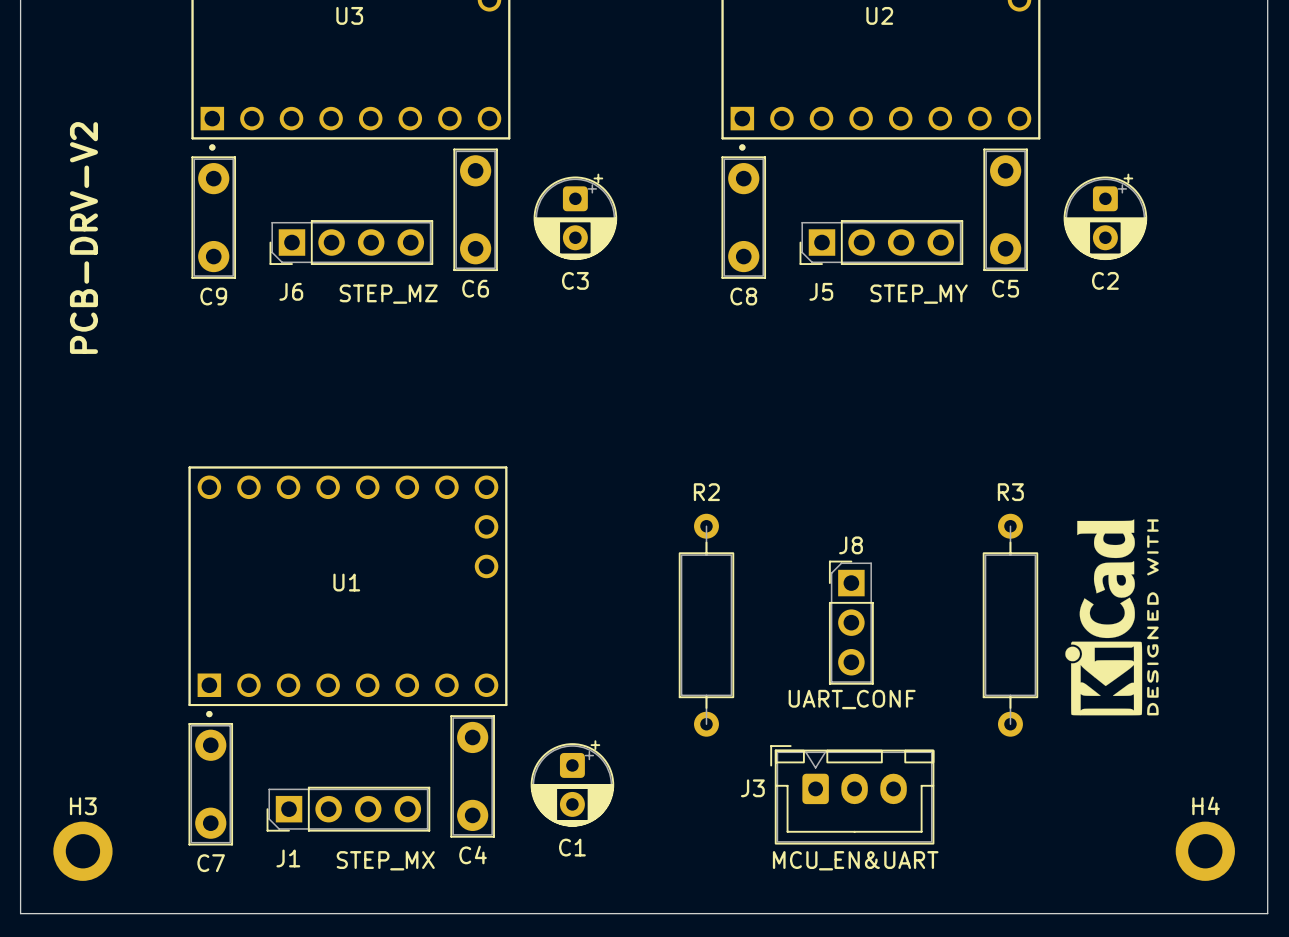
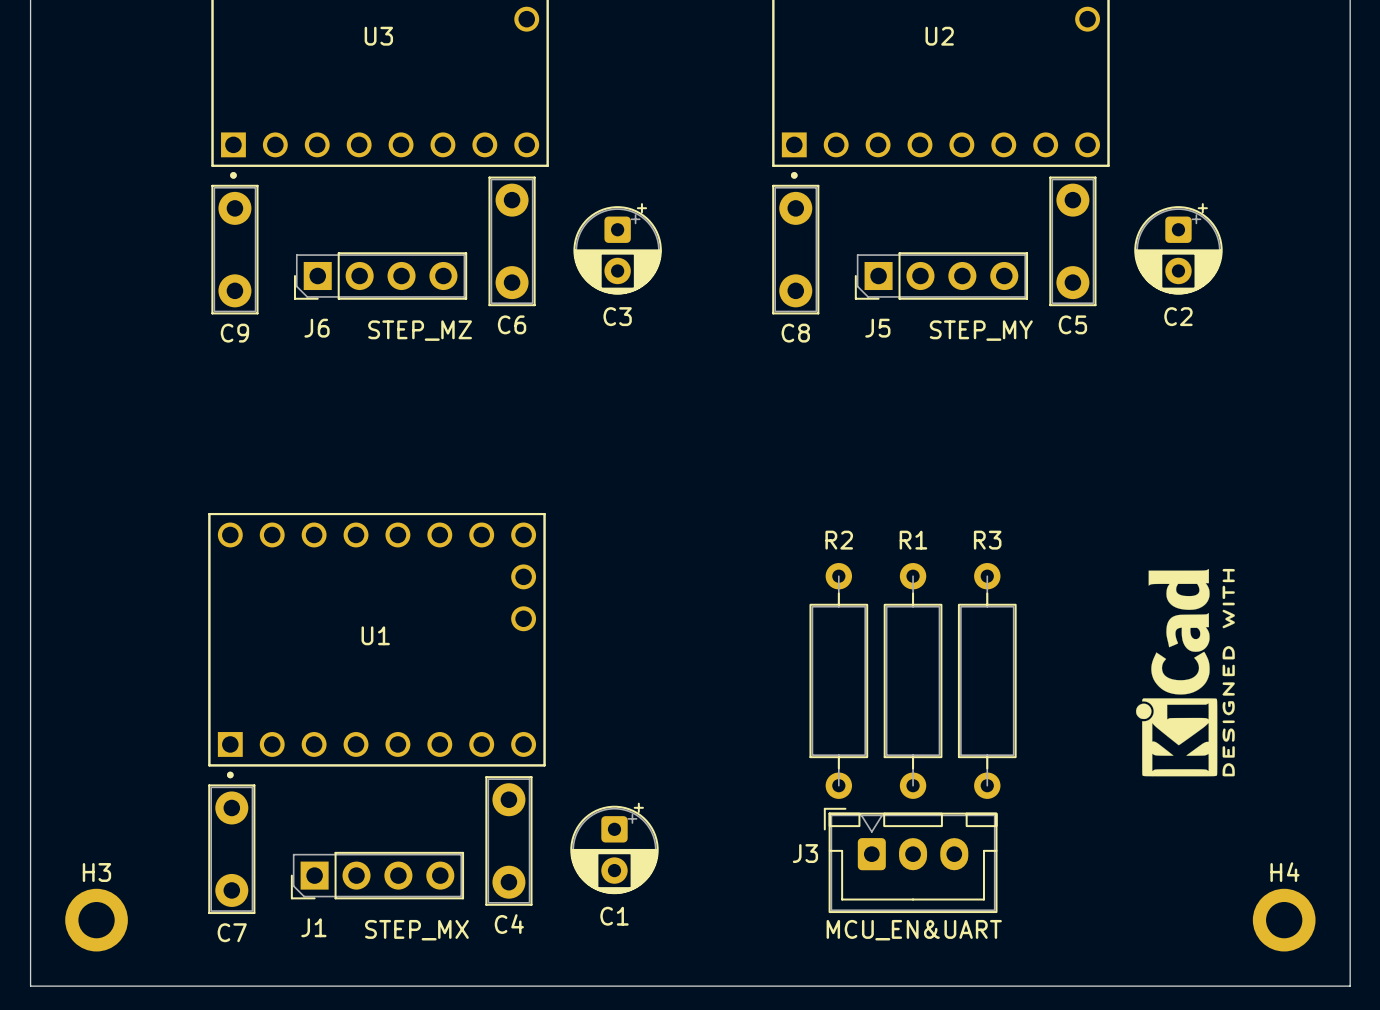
text: PCB-DRV-V2 (83, 238) -> none
J8: UART_CONF (851, 622) -> none
R2 position: (706, 625) -> (838, 680)
R1: none -> (913, 680)
R3 position: (1010, 625) -> (987, 680)

